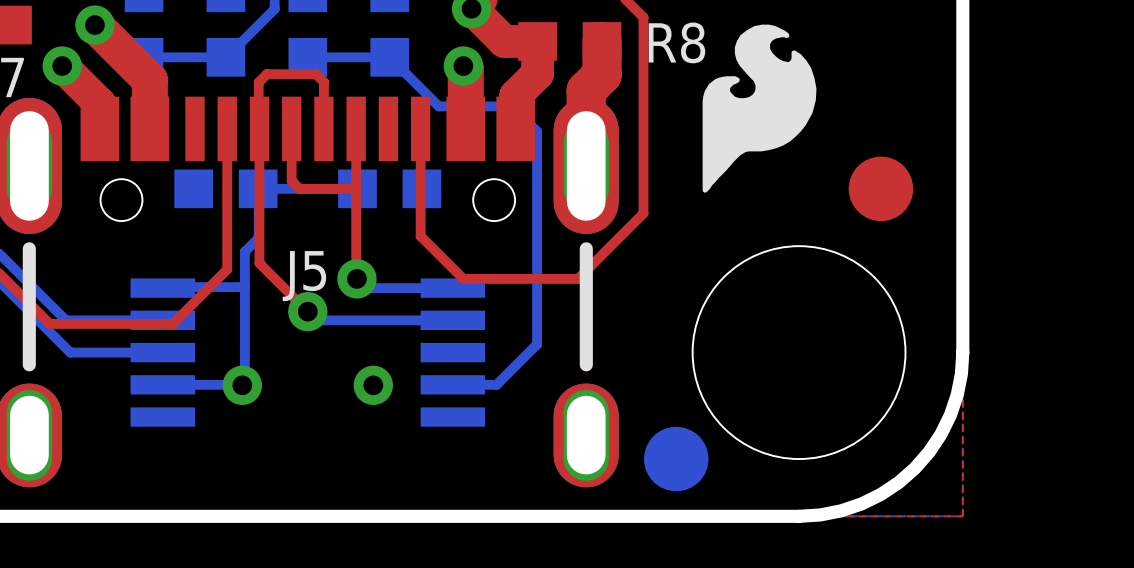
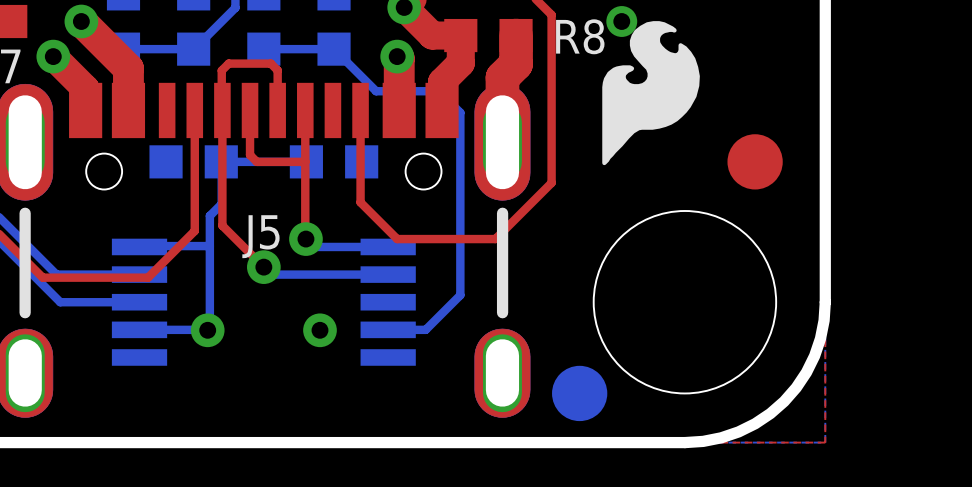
via: none -> (621, 21)

